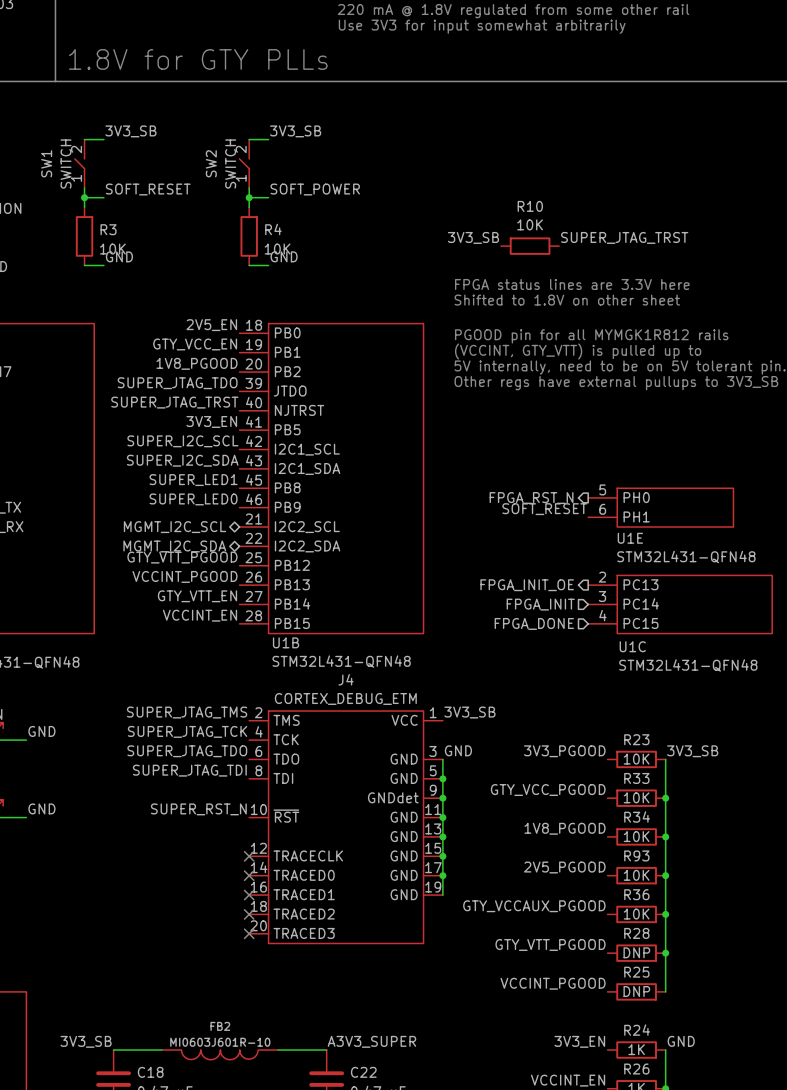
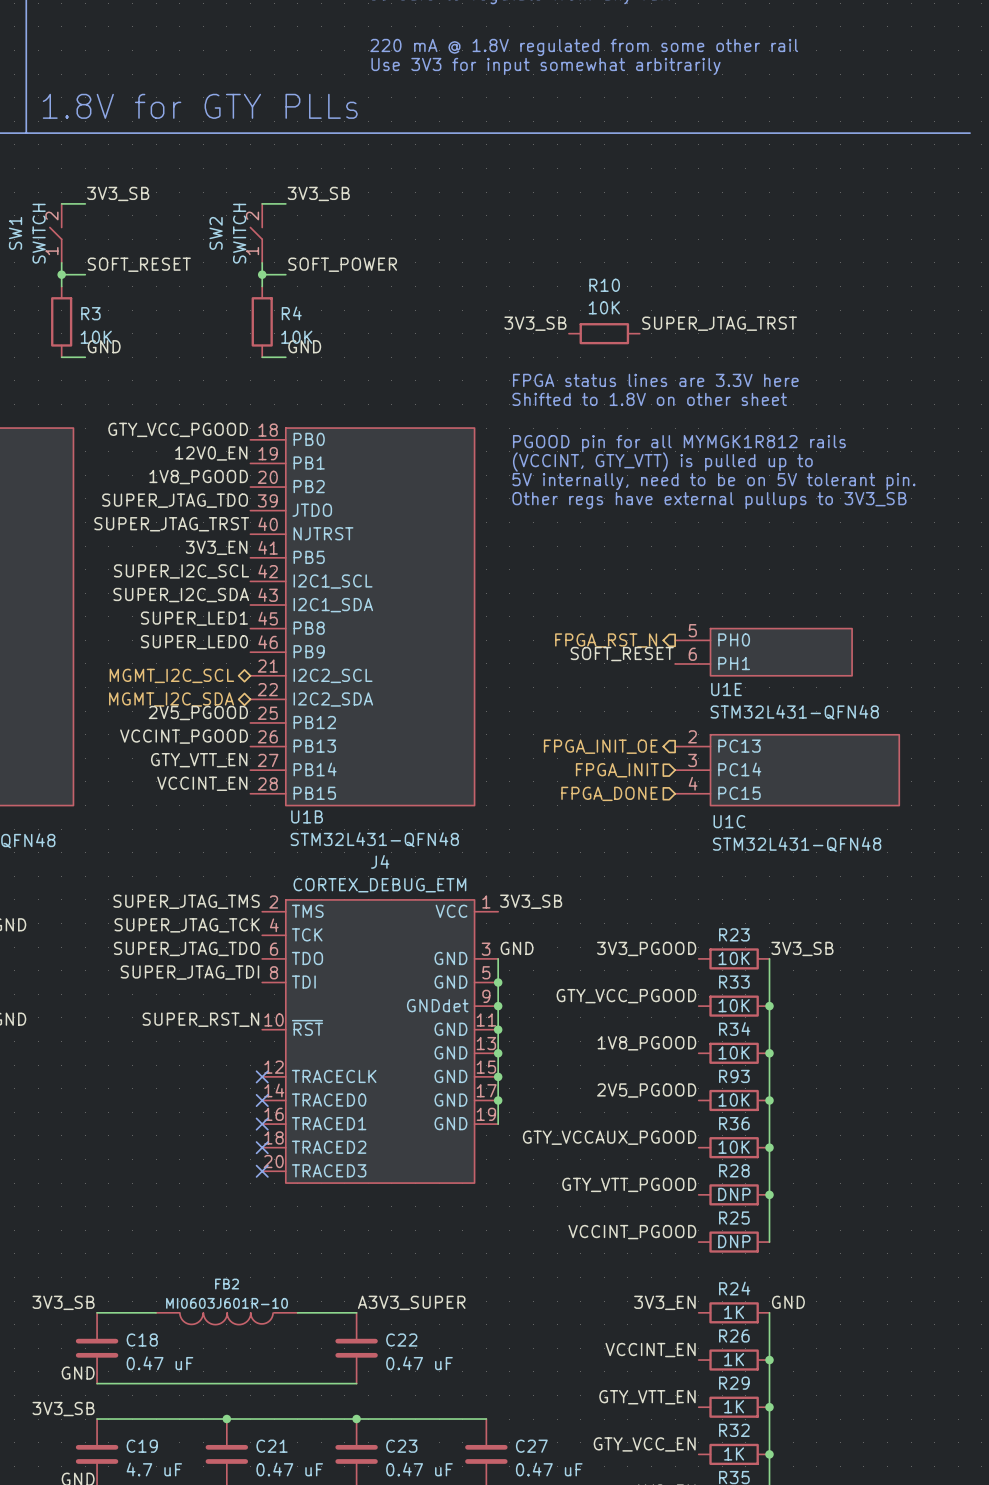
label: 2V5_EN (211, 325) -> GTY_VCC_PGOOD (178, 429)
label: GTY_VCC_EN (195, 344) -> 12V0_EN (211, 453)
label: GTY_VTT_PGOOD (182, 557) -> 2V5_PGOOD (198, 713)

